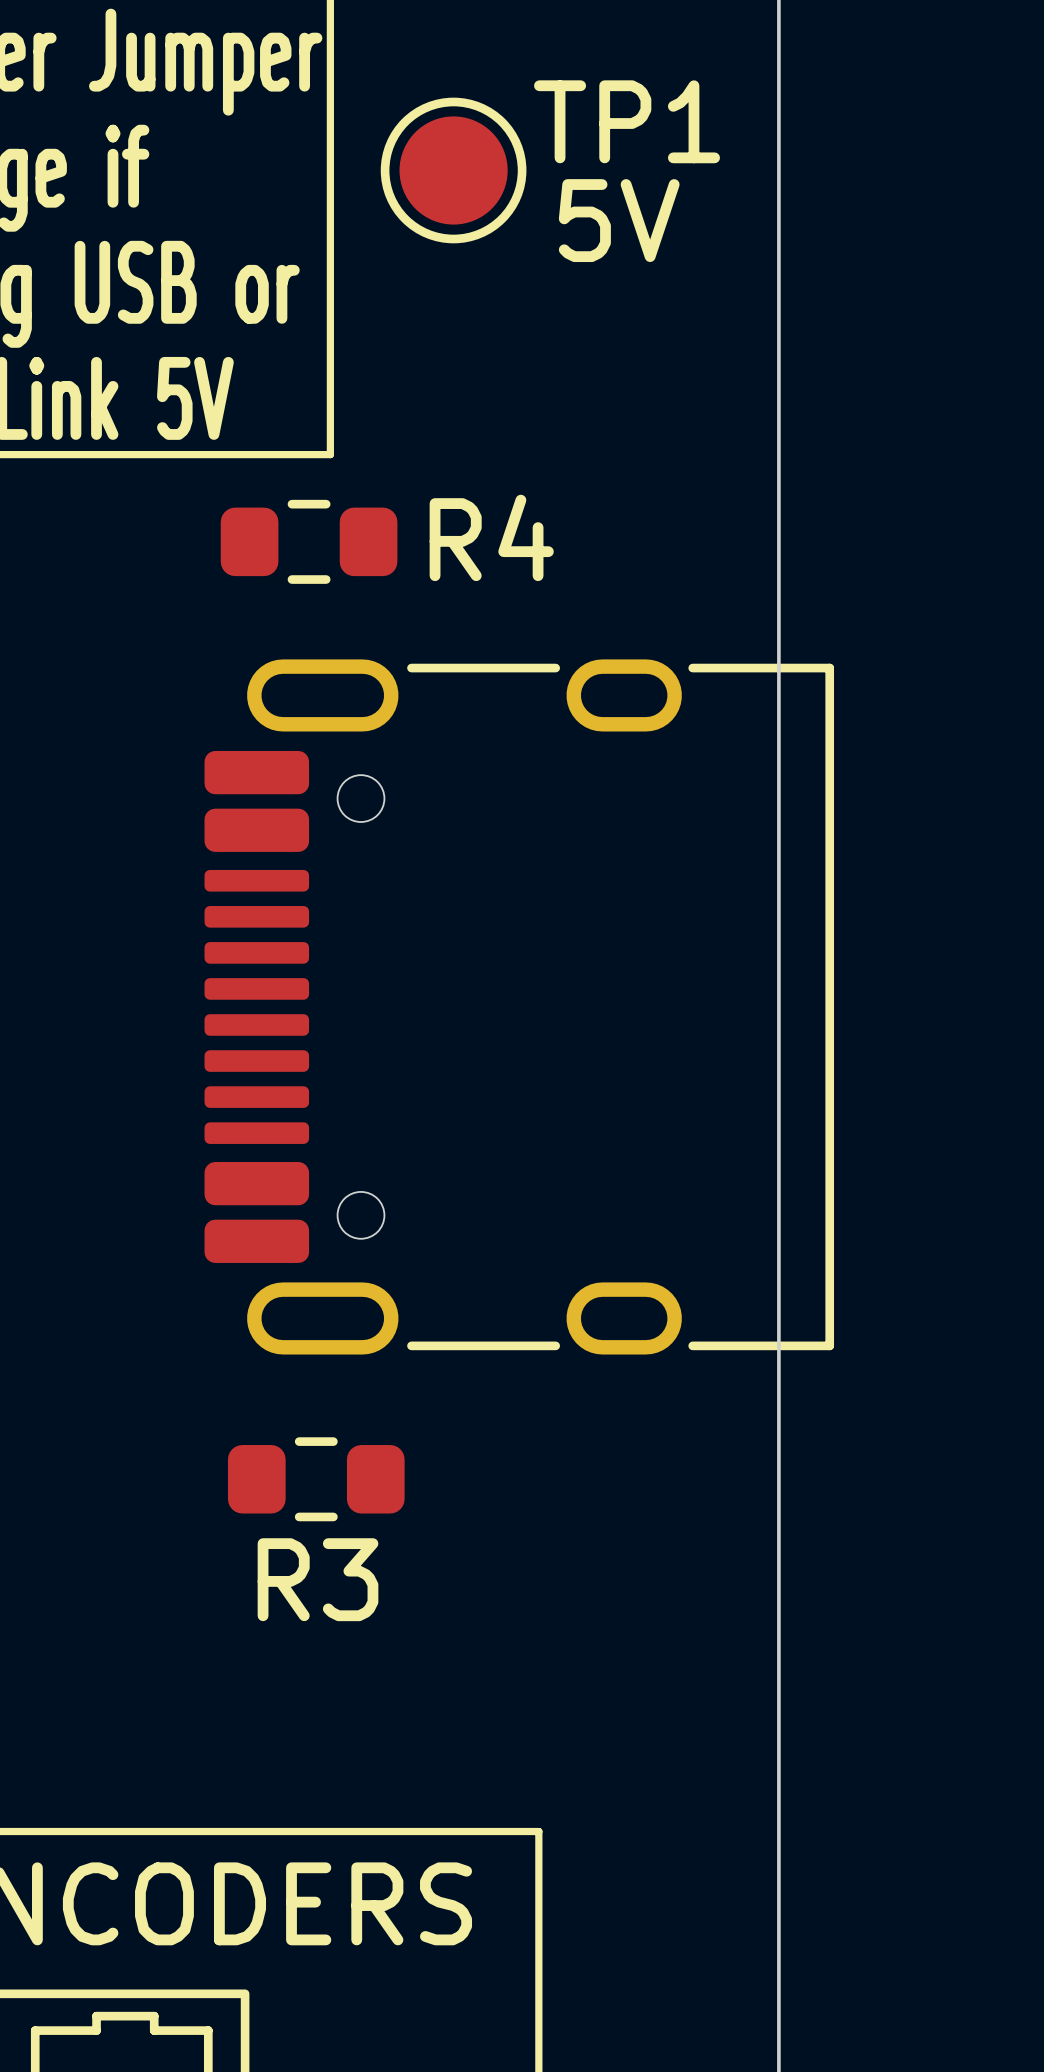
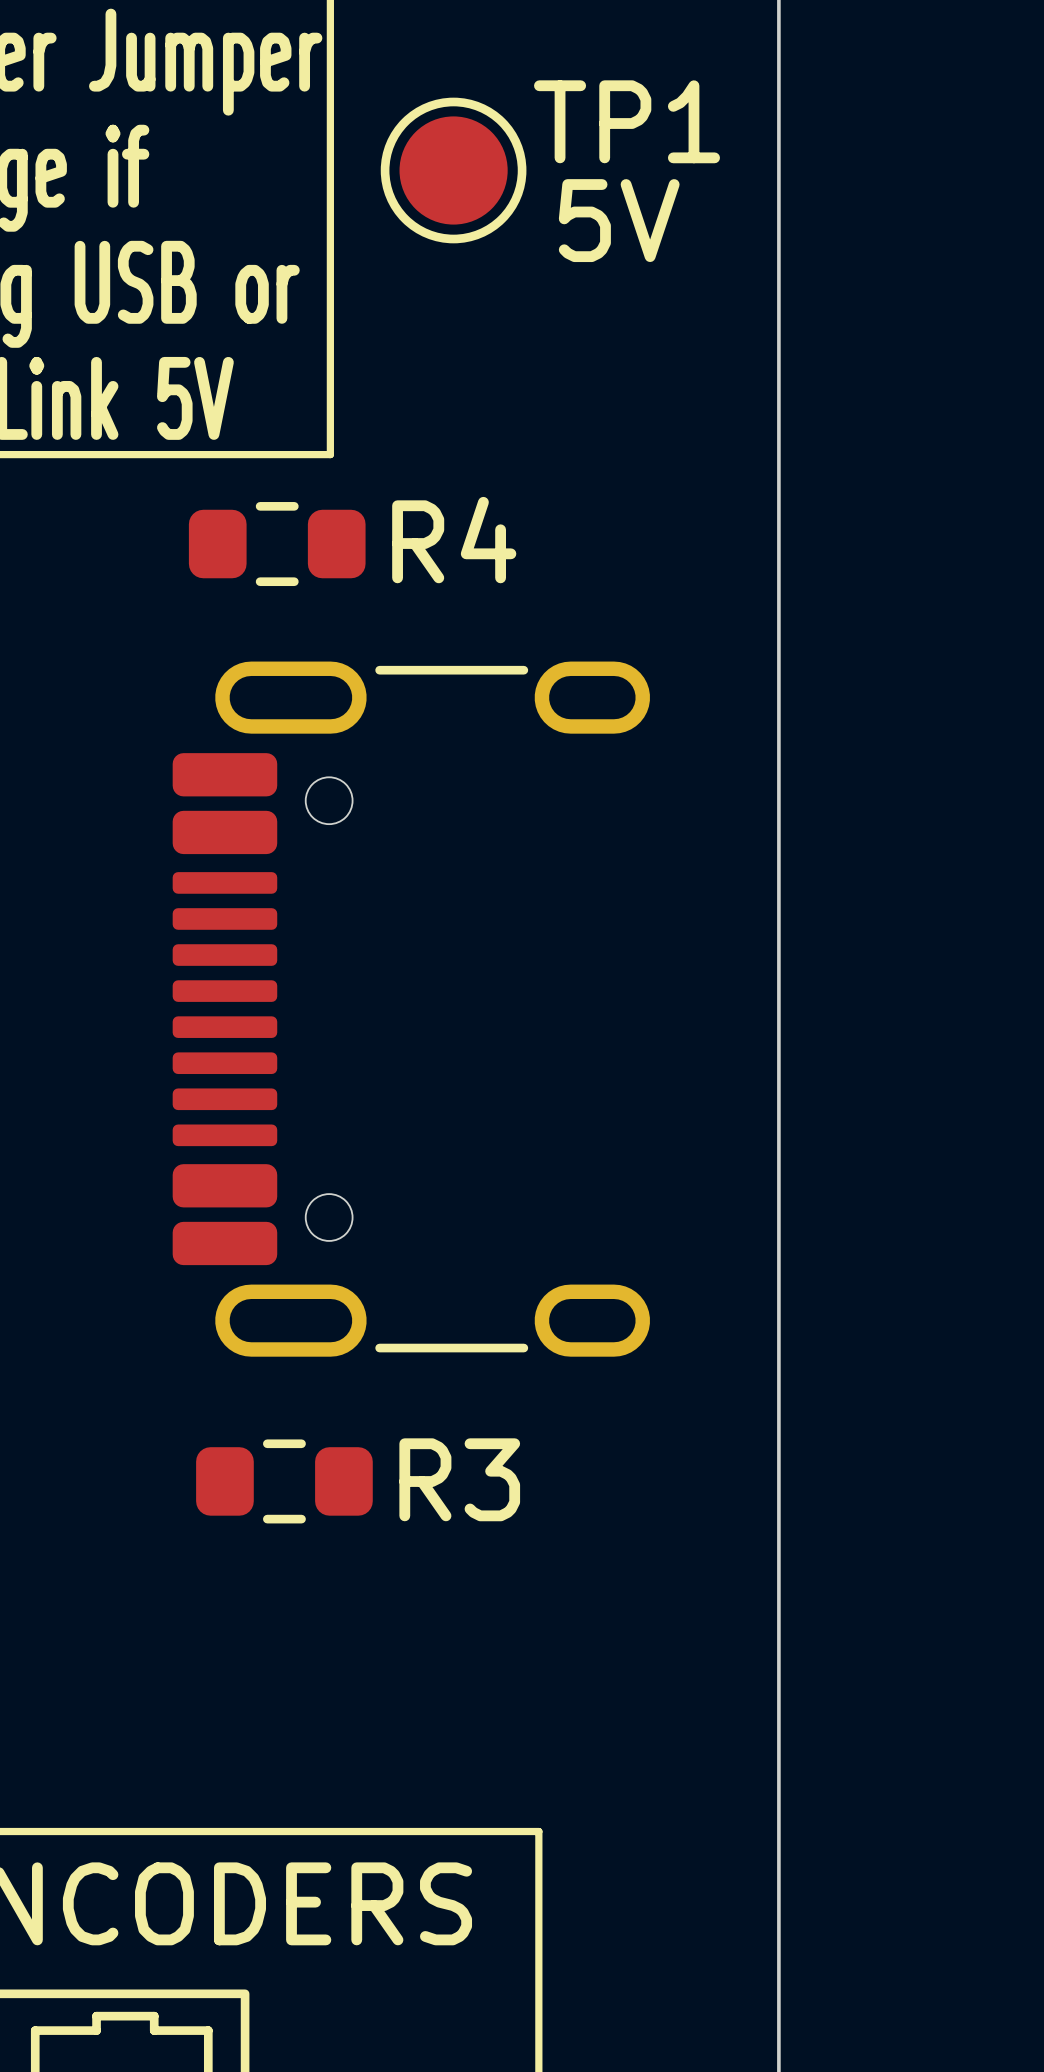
R4 name position: R4 (491, 537) -> R4 (454, 540)
R4 position: (309, 541) -> (277, 544)
part: (519, 1006) -> none
part: none -> (411, 1009)
R3 position: (316, 1479) -> (284, 1481)
R3 name position: R3 (318, 1579) -> R3 (459, 1479)

